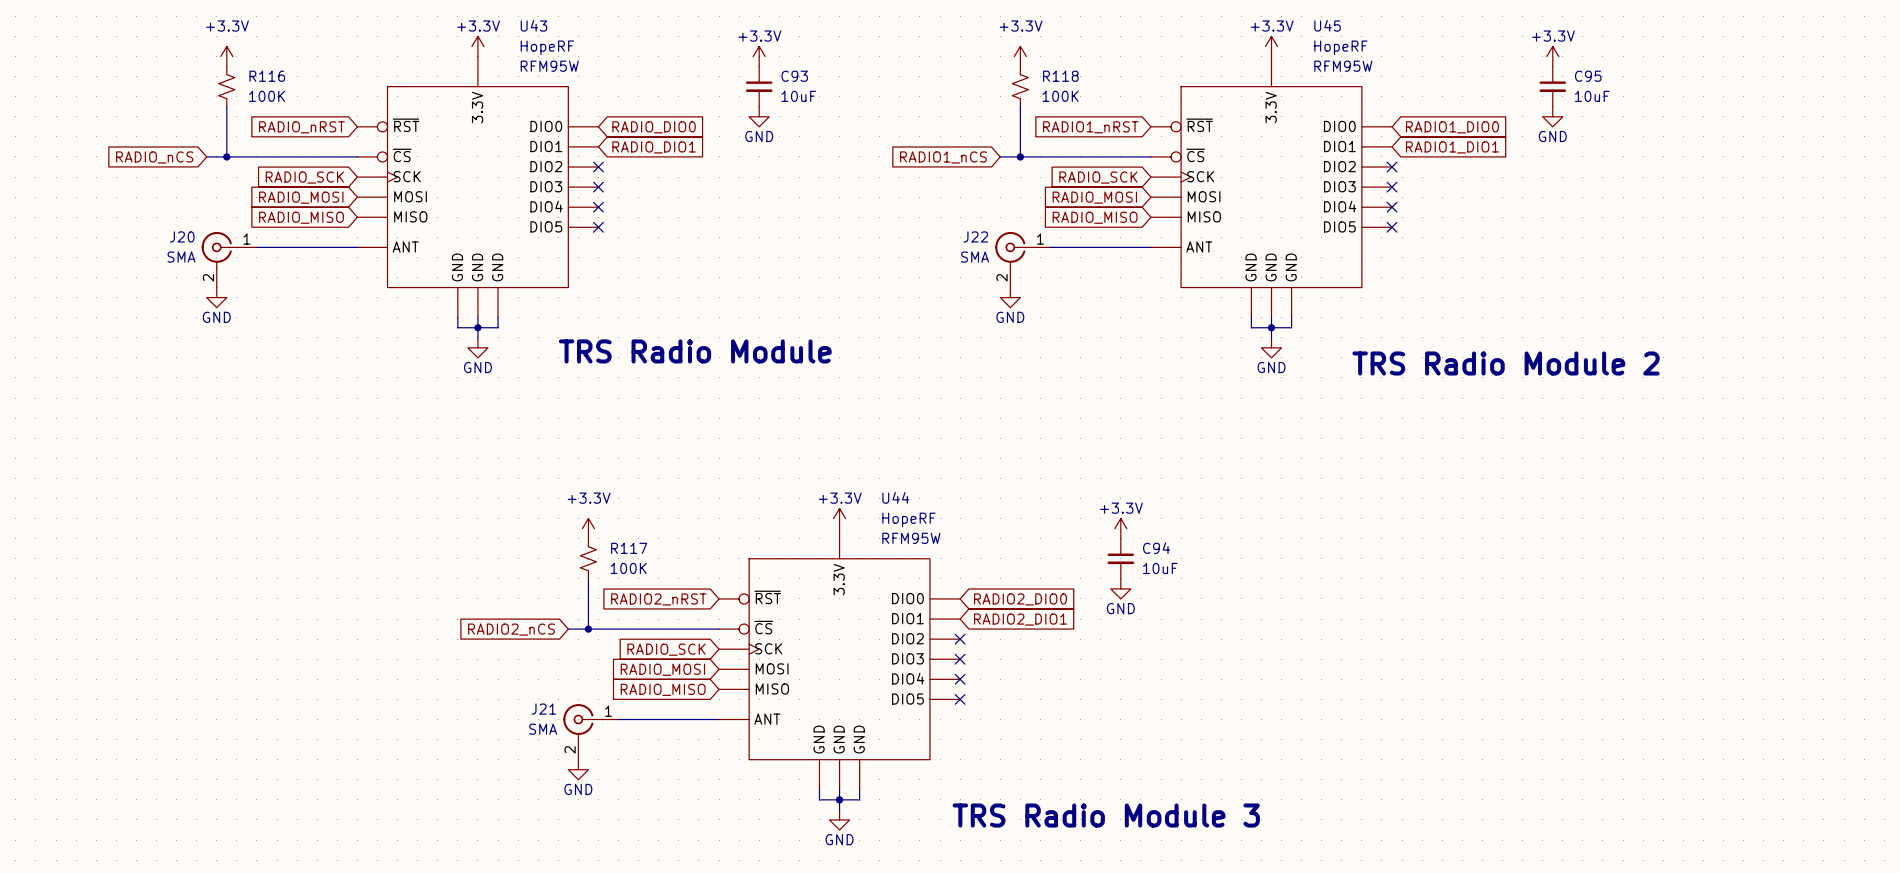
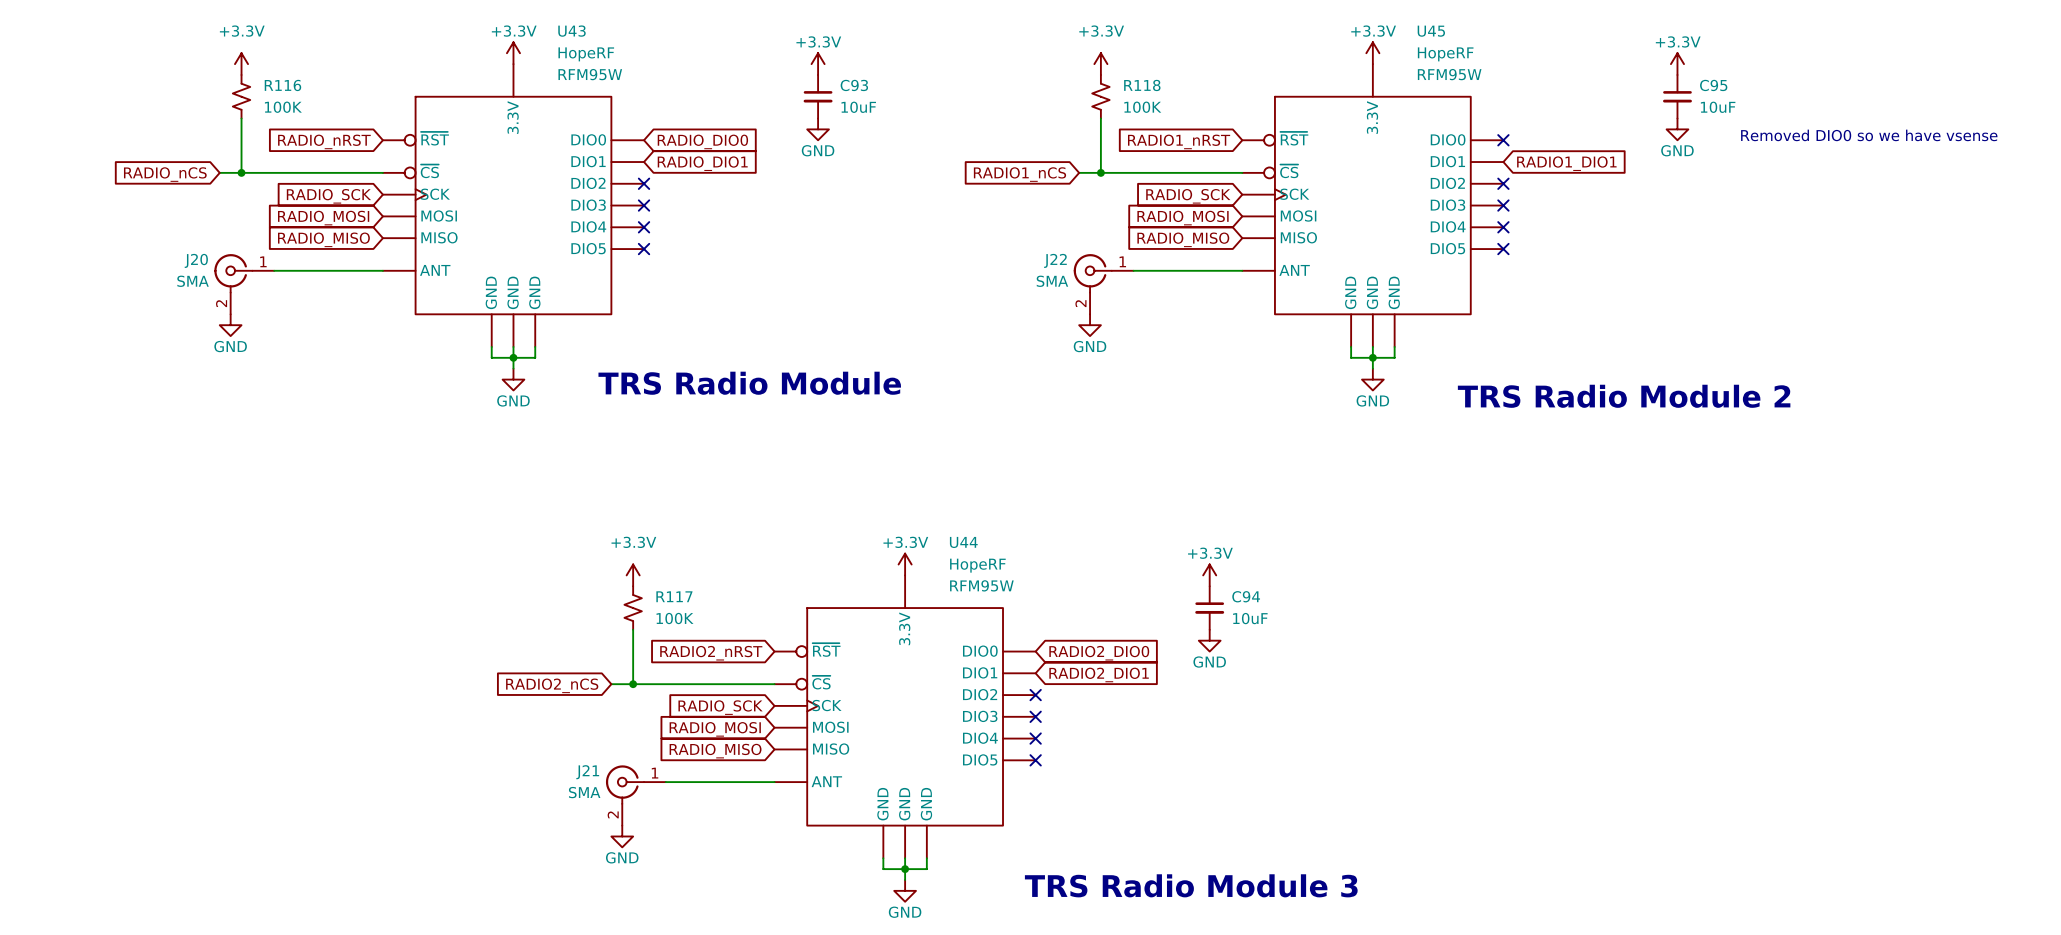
text: none -> Removed DIO0 so we have vsense (1869, 135)
no-connect mark: none -> (1503, 140)
global label: RADIO1_DIO0 (1452, 127) -> none

